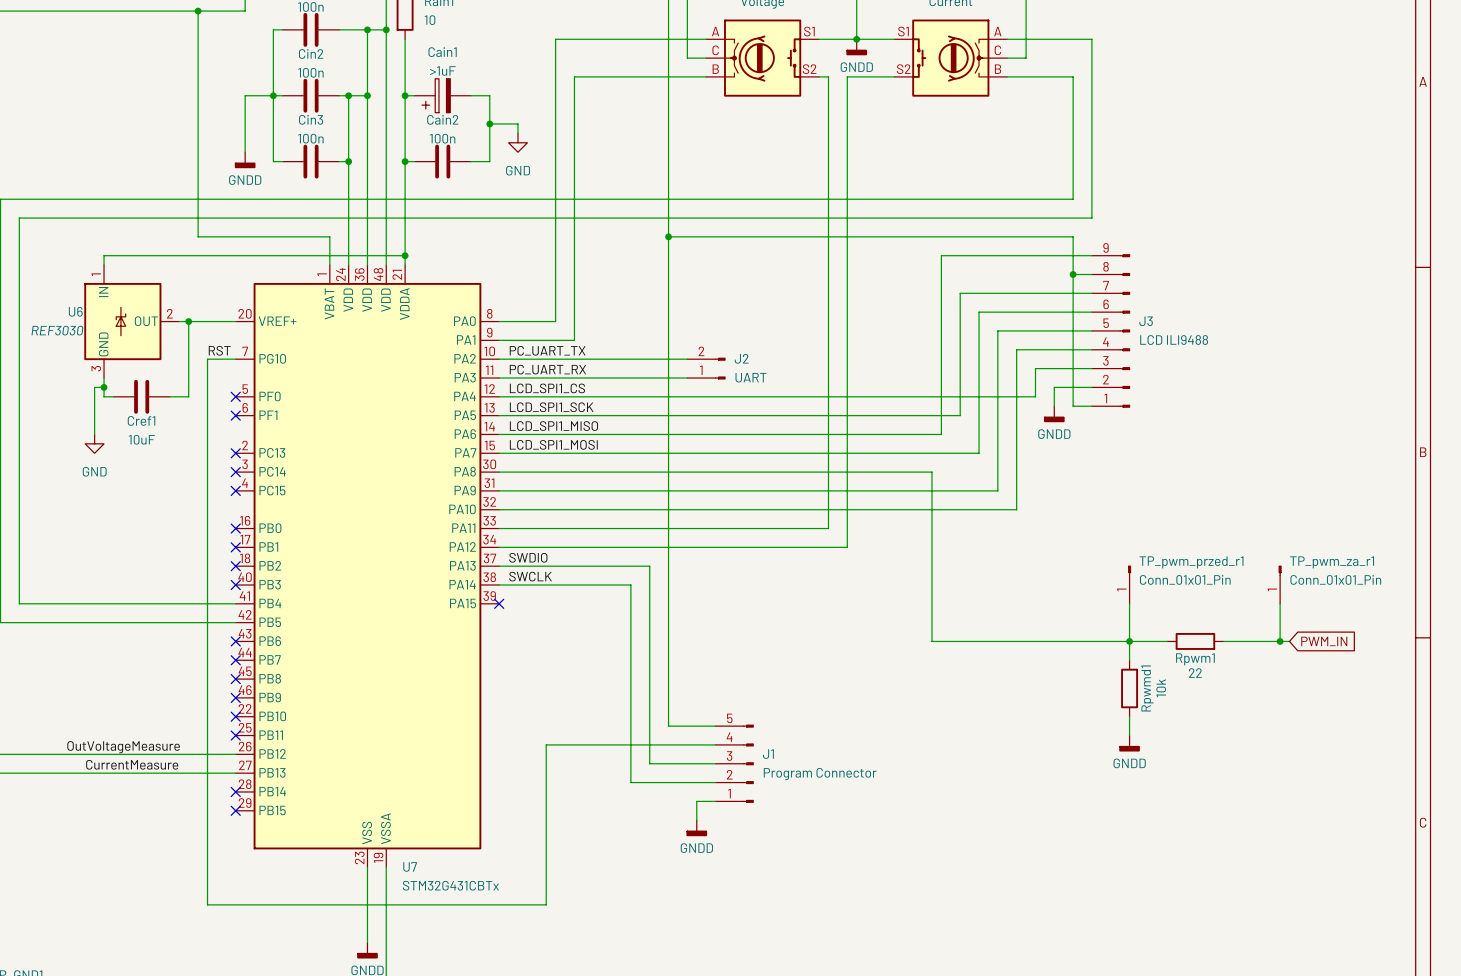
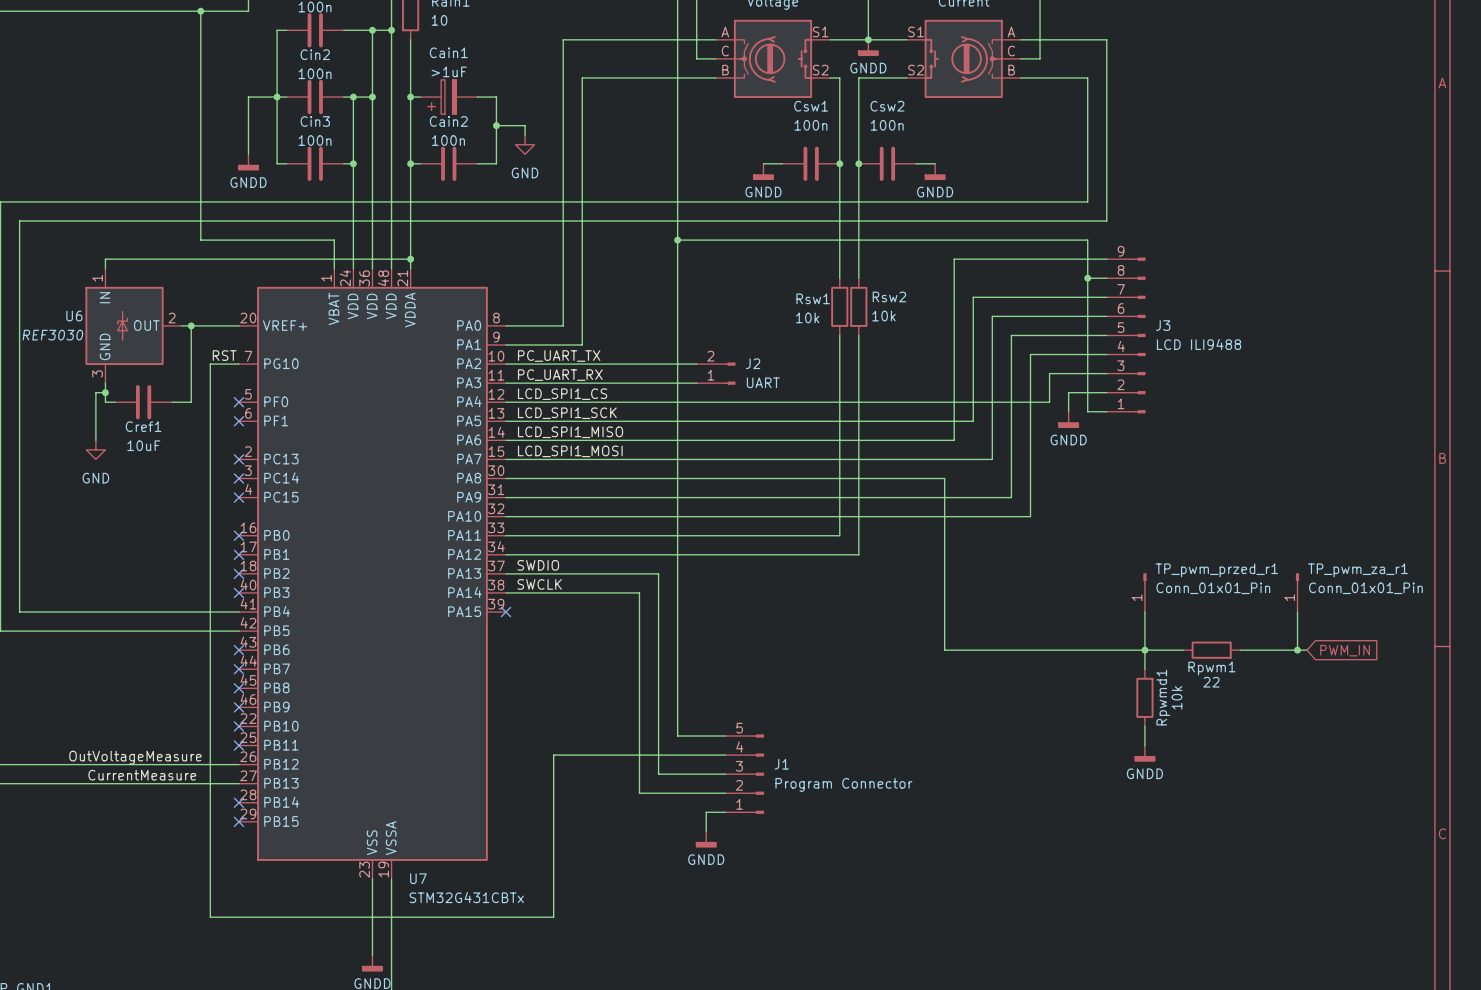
wire: none -> (763, 163) (782, 163)
Csw1: none -> 100n (811, 163)
junction: none -> (839, 163)
junction: none -> (858, 163)
Csw2: none -> 100n (887, 163)
wire: none -> (916, 163) (935, 163)
power symbol: none -> GNDD (763, 171)
power symbol: none -> GNDD (935, 171)
wire: (828, 274) (828, 330) -> none
wire: (847, 274) (847, 330) -> none
Rsw1: none -> 10k (839, 306)
Rsw2: none -> 10k (858, 306)

